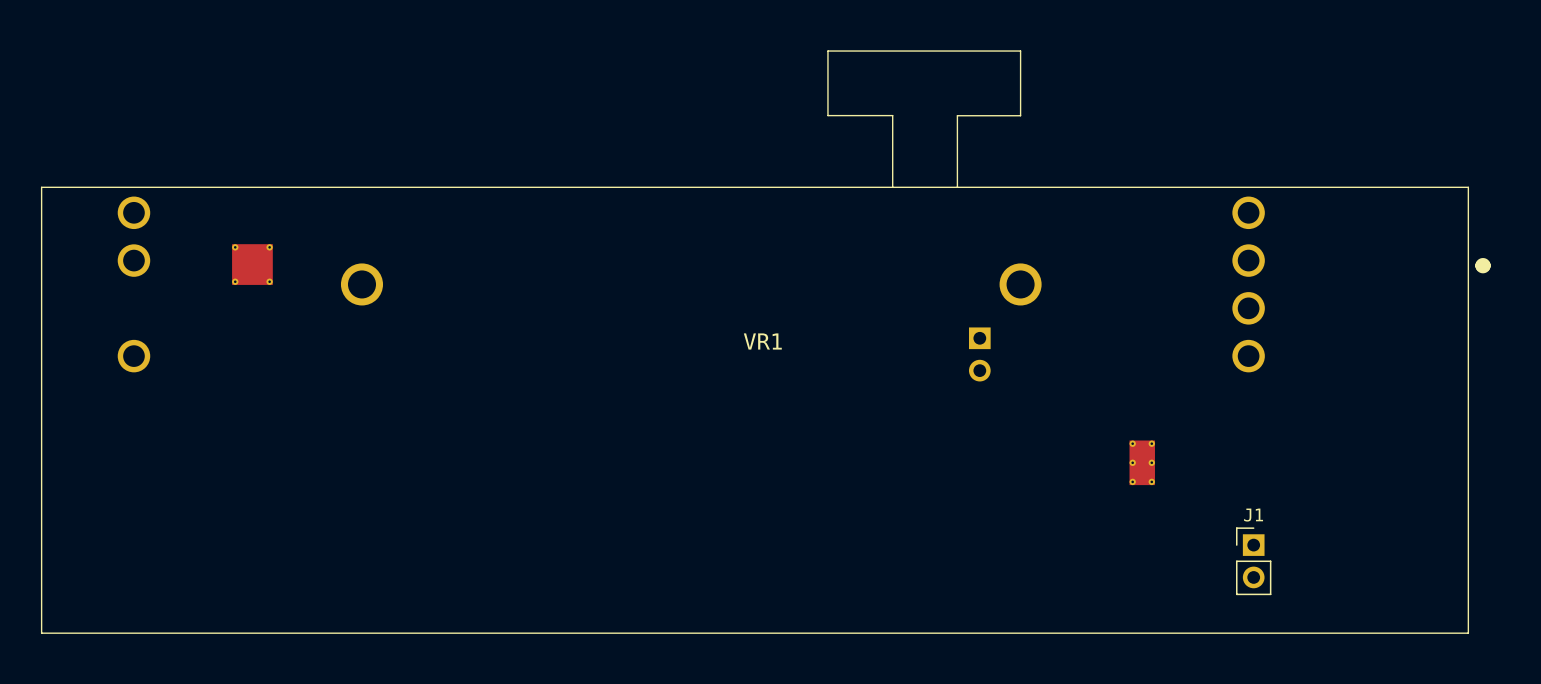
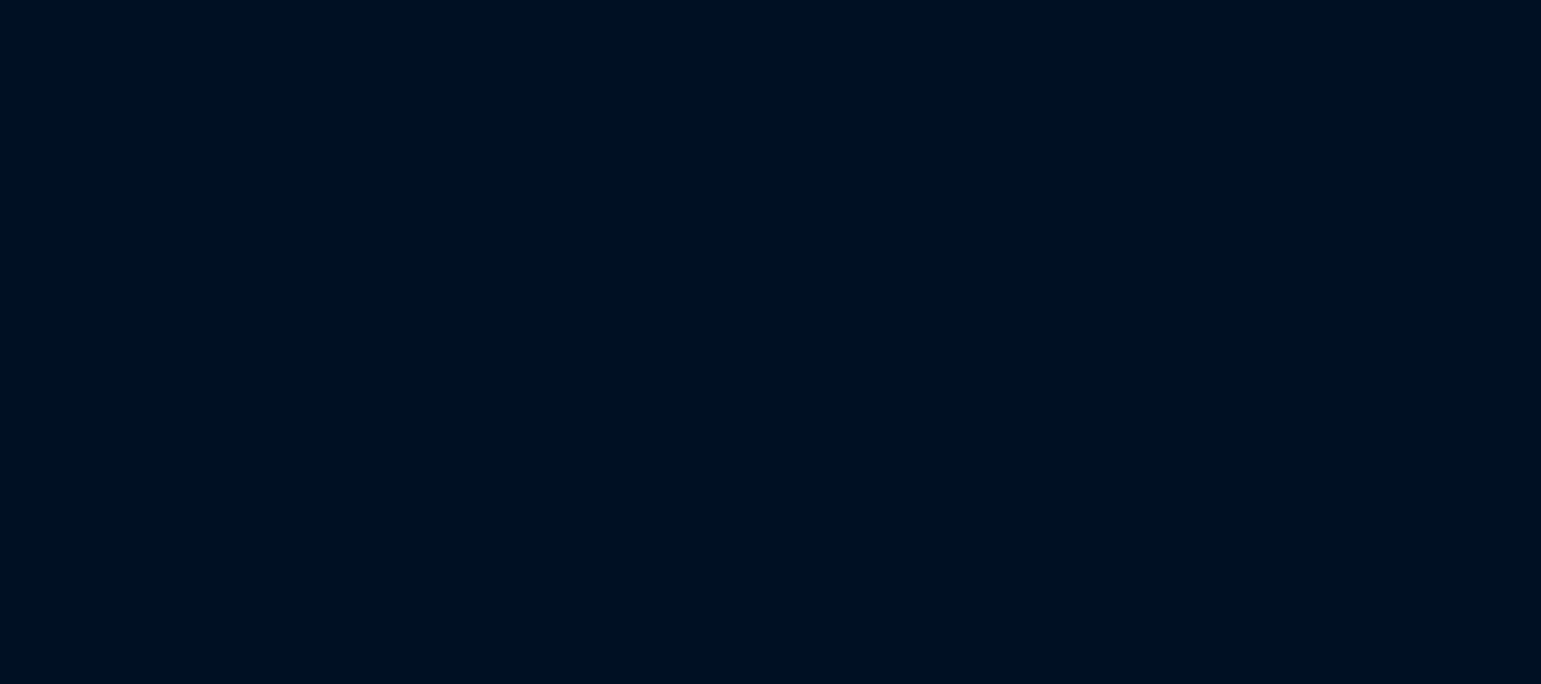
part: (252, 264) -> none
VR1: (765, 342) -> none
part: (979, 354) -> none
part: (1142, 462) -> none
J1: (1253, 561) -> none

